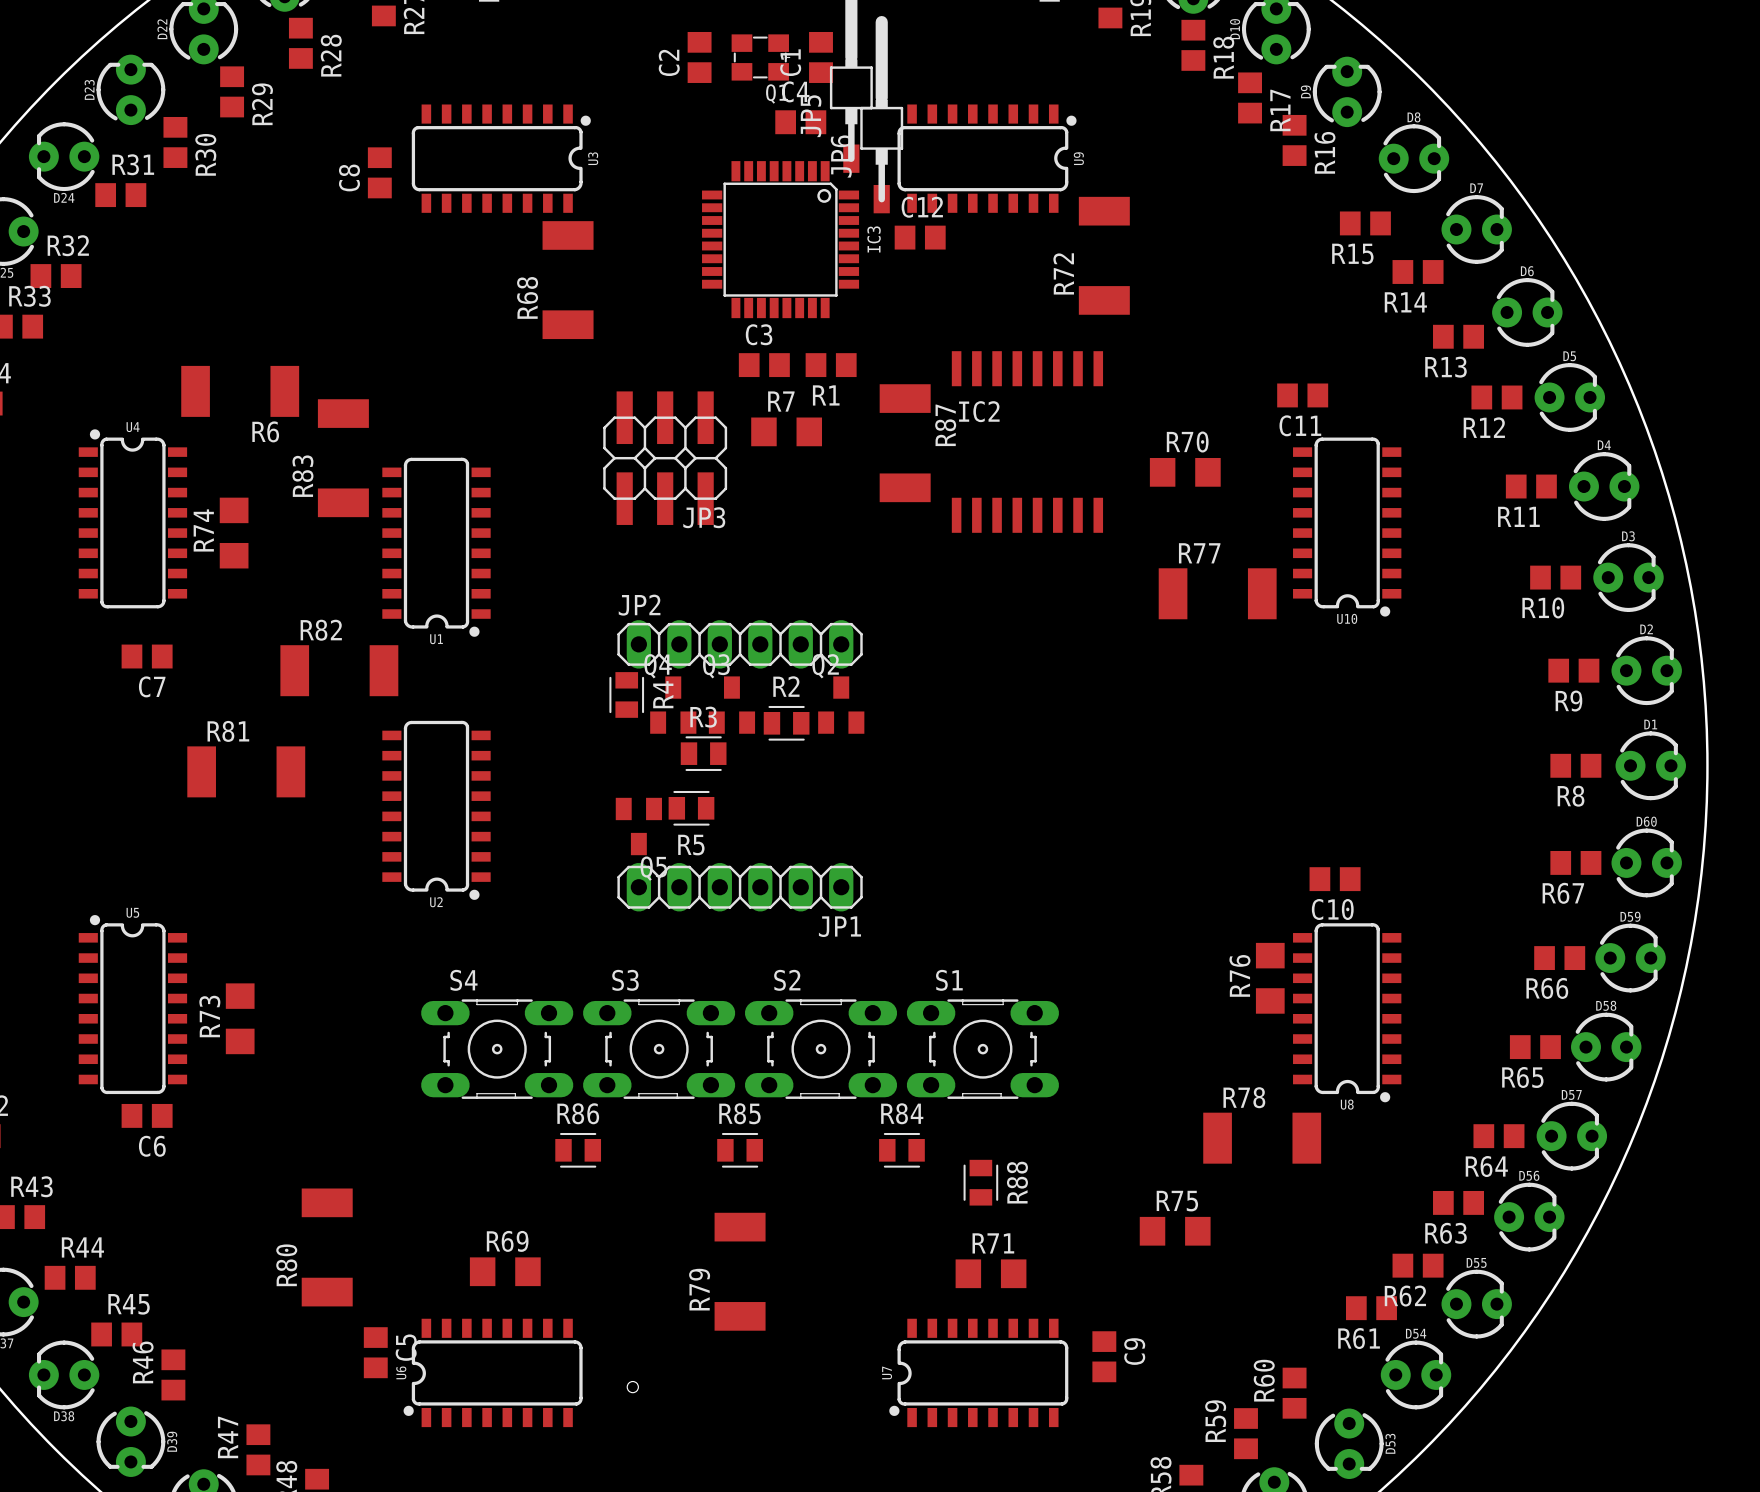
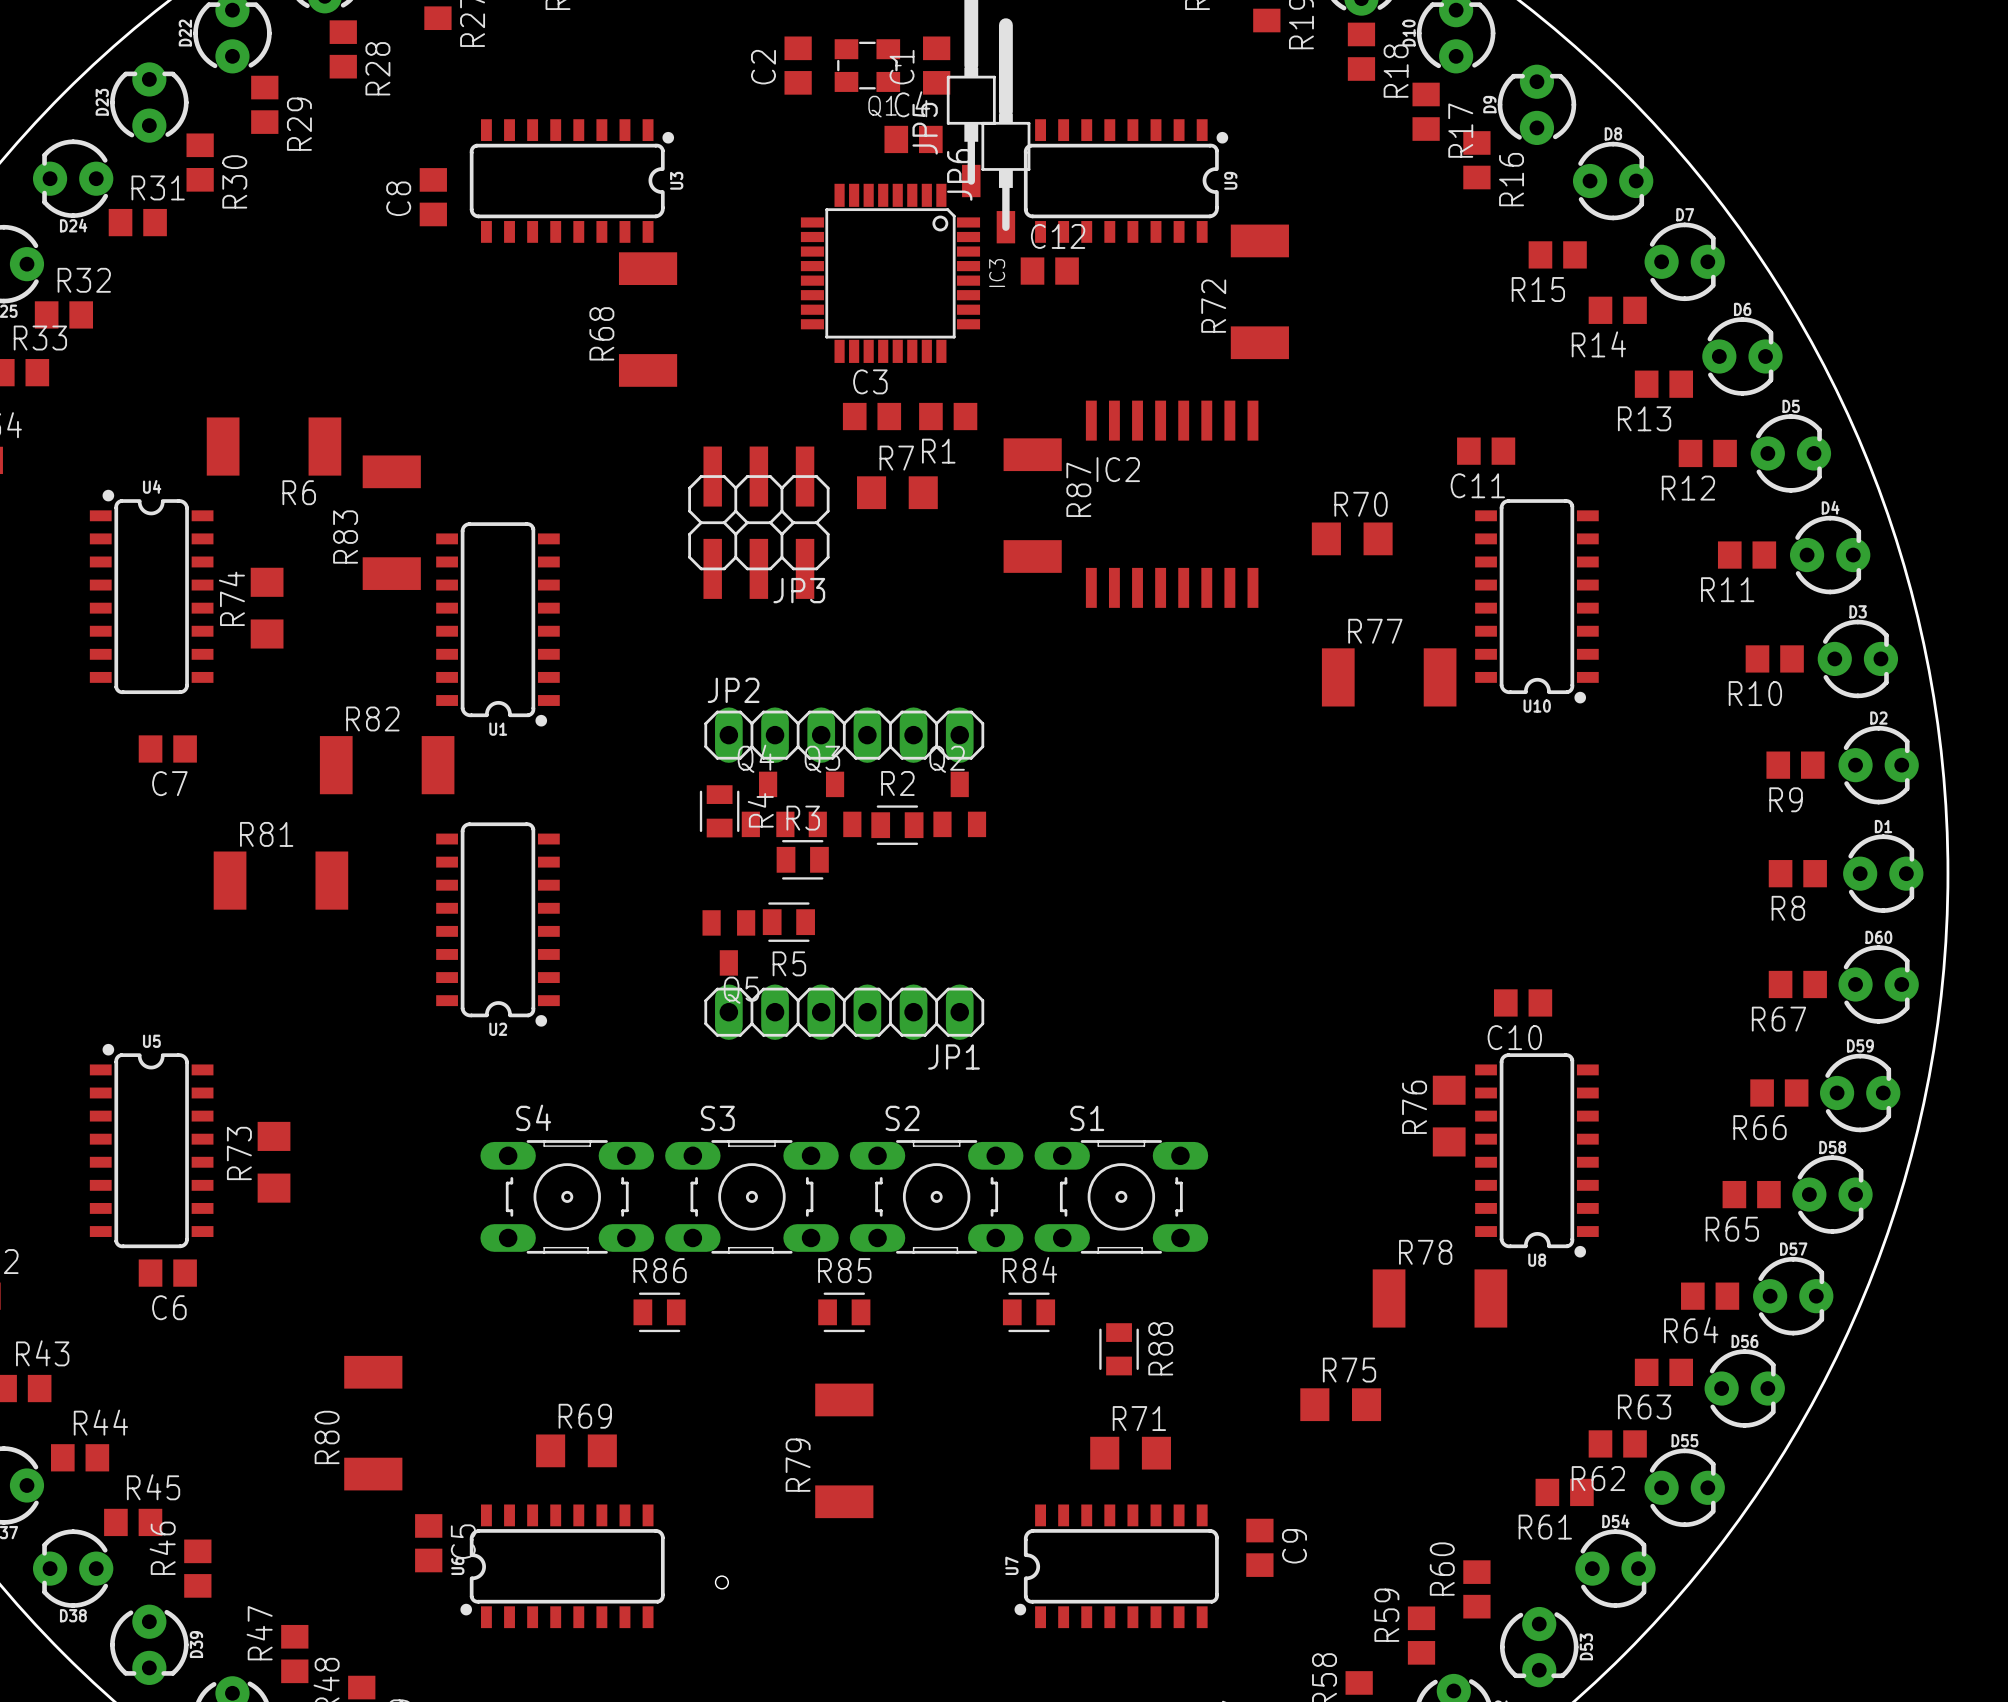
R4 position: (626, 694) -> (719, 811)

